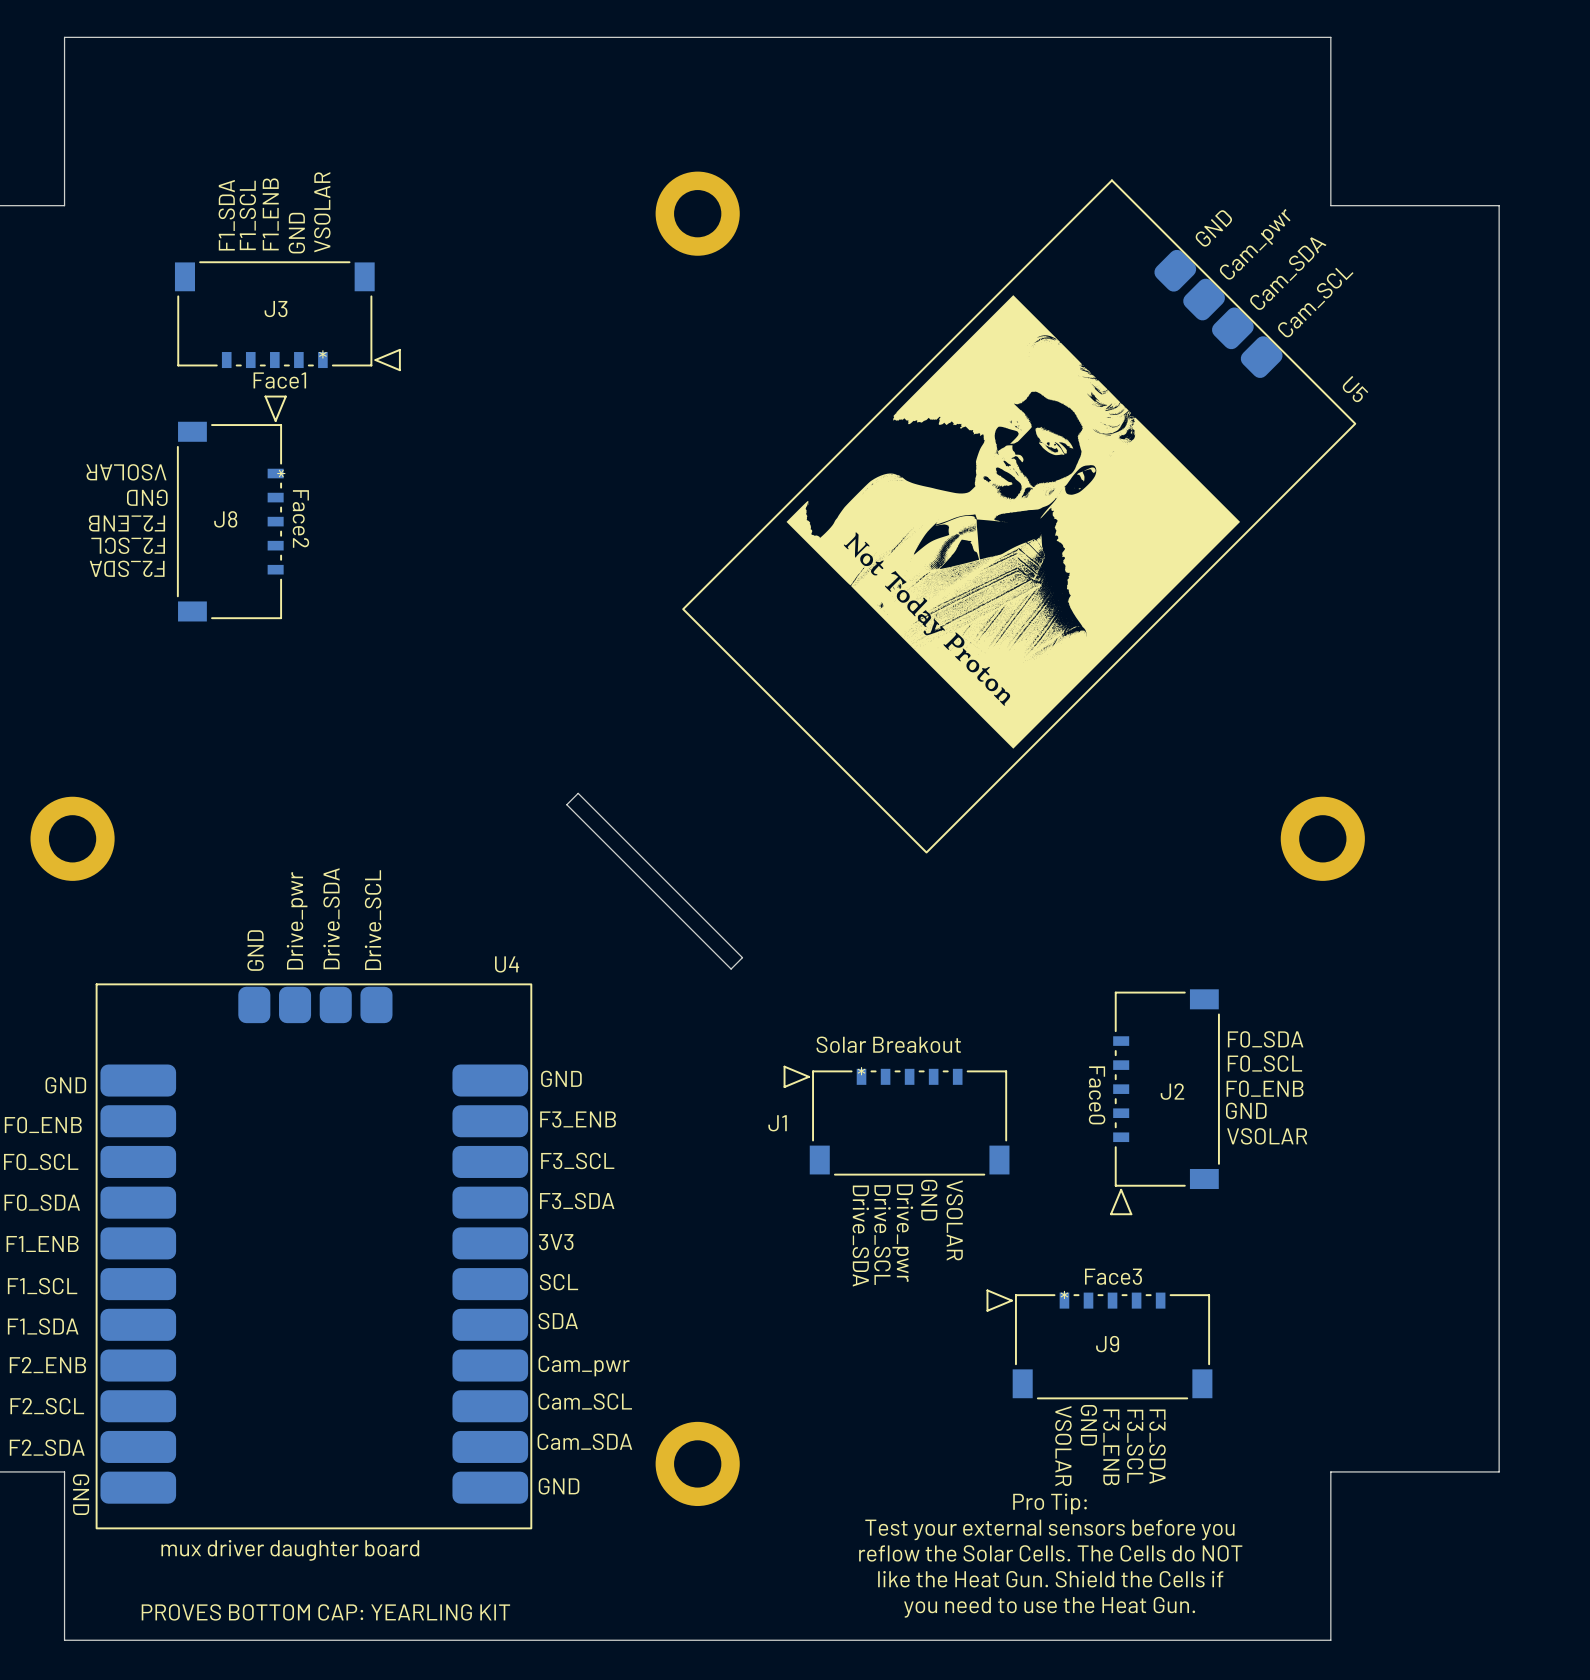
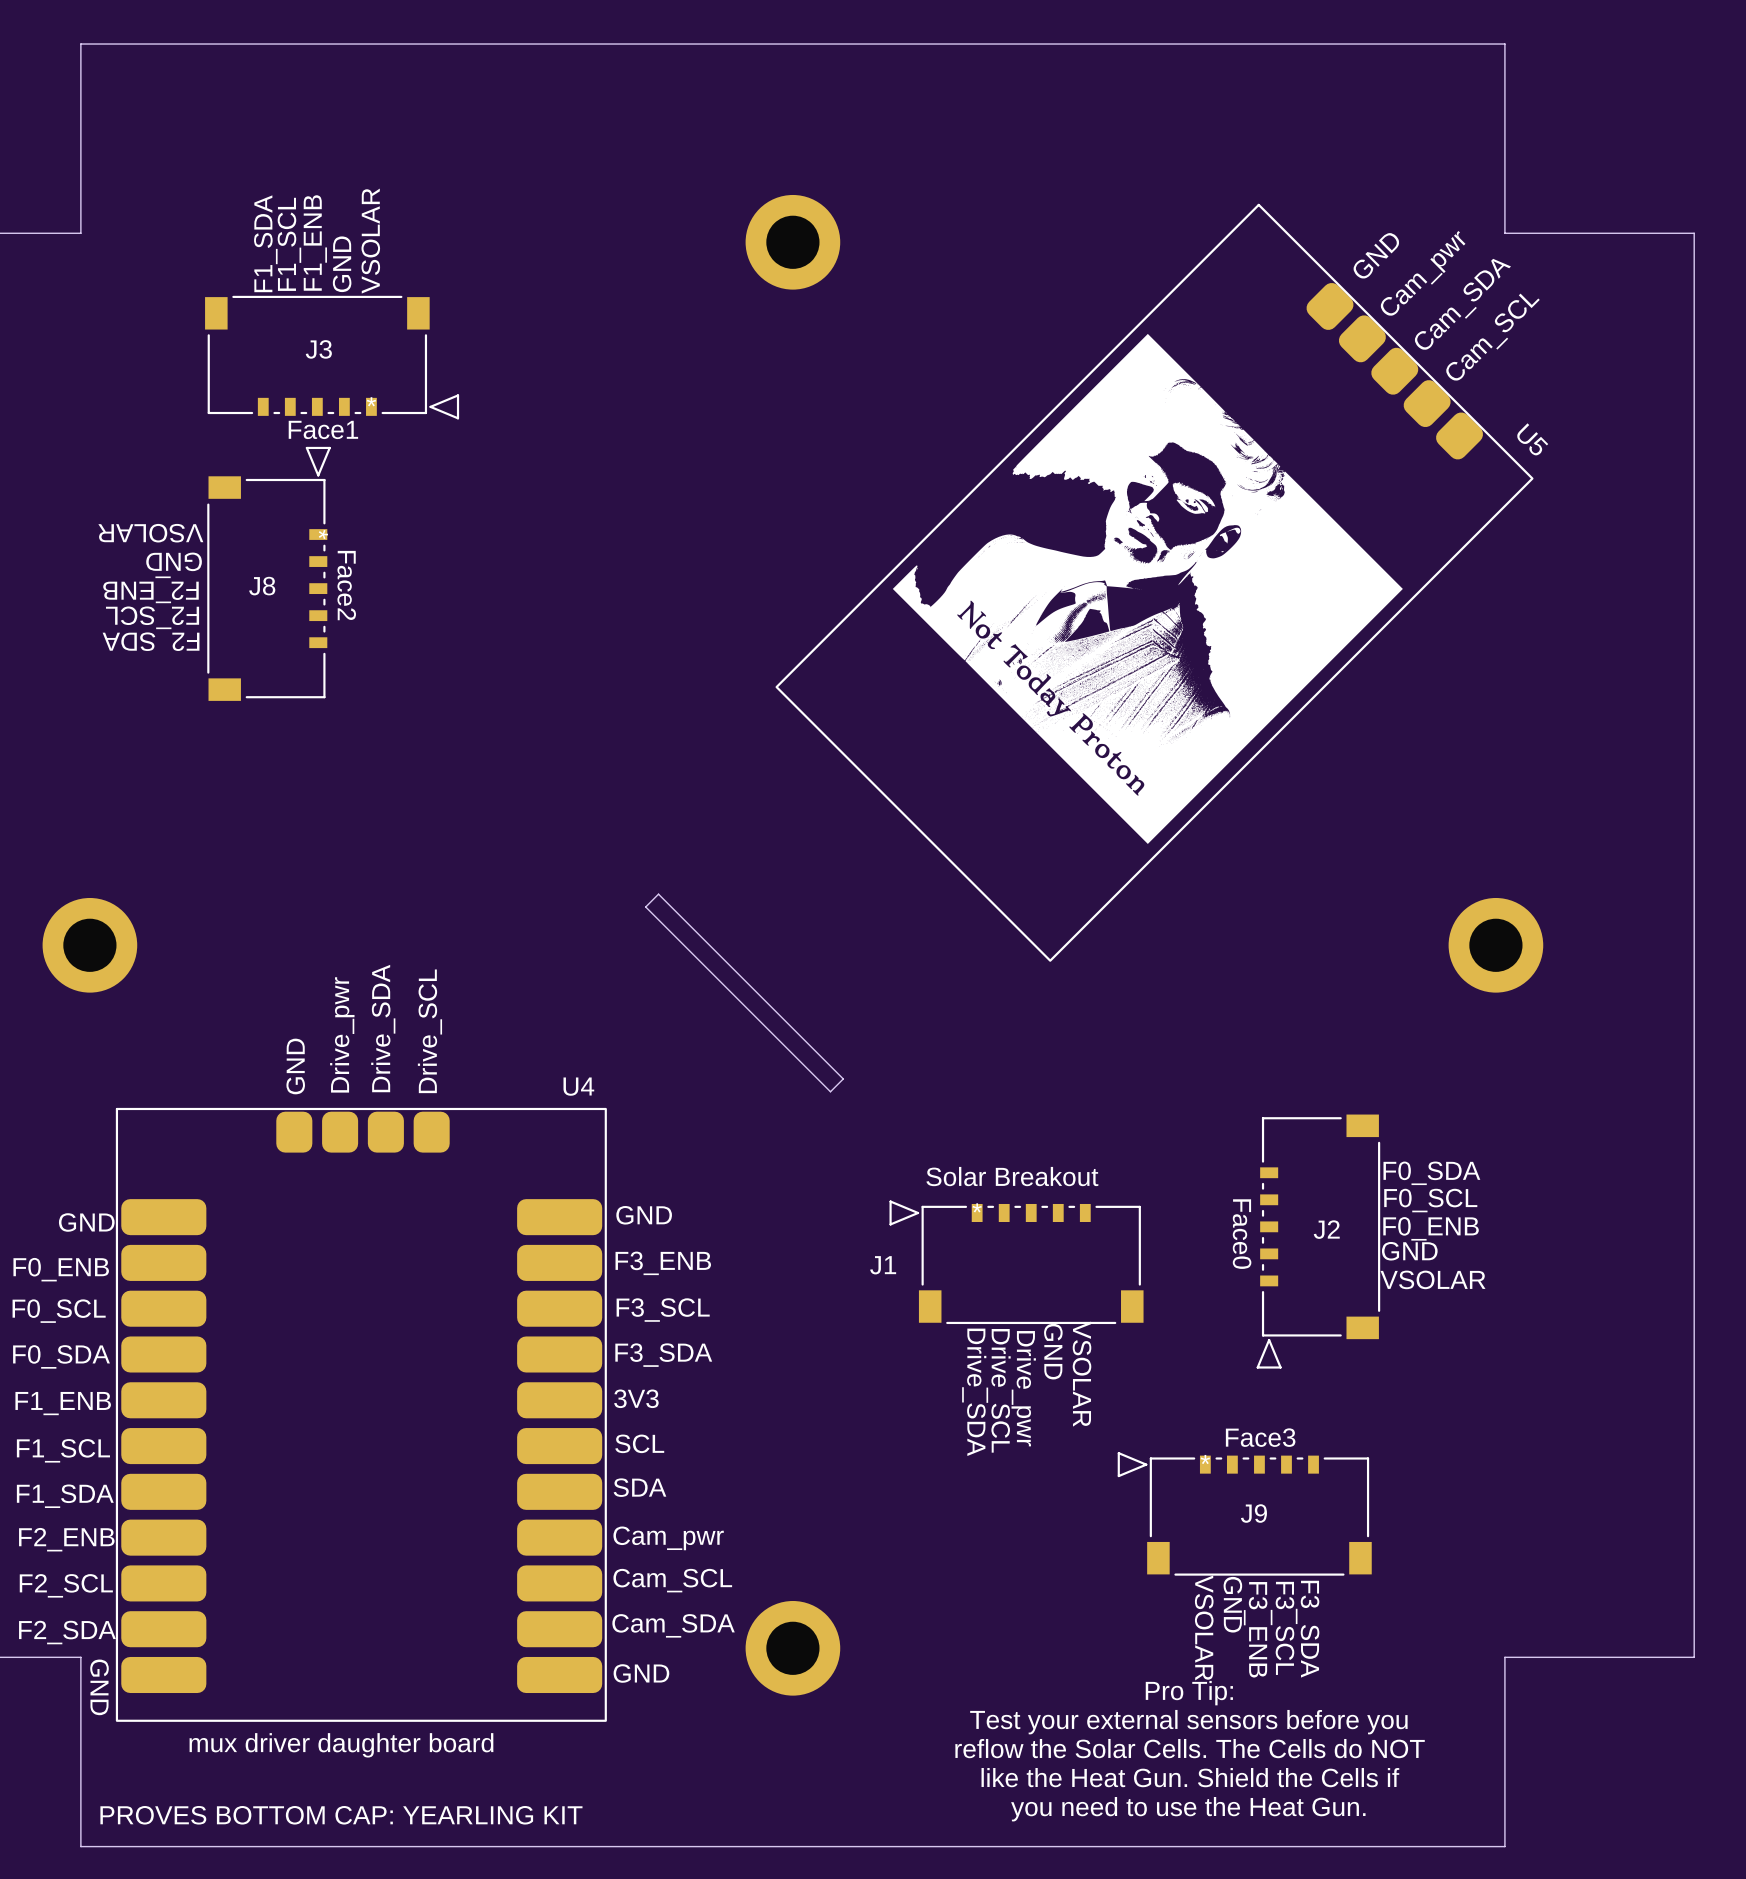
U5 footprint: [682, 179, 1357, 854] -> [775, 203, 1534, 962]

